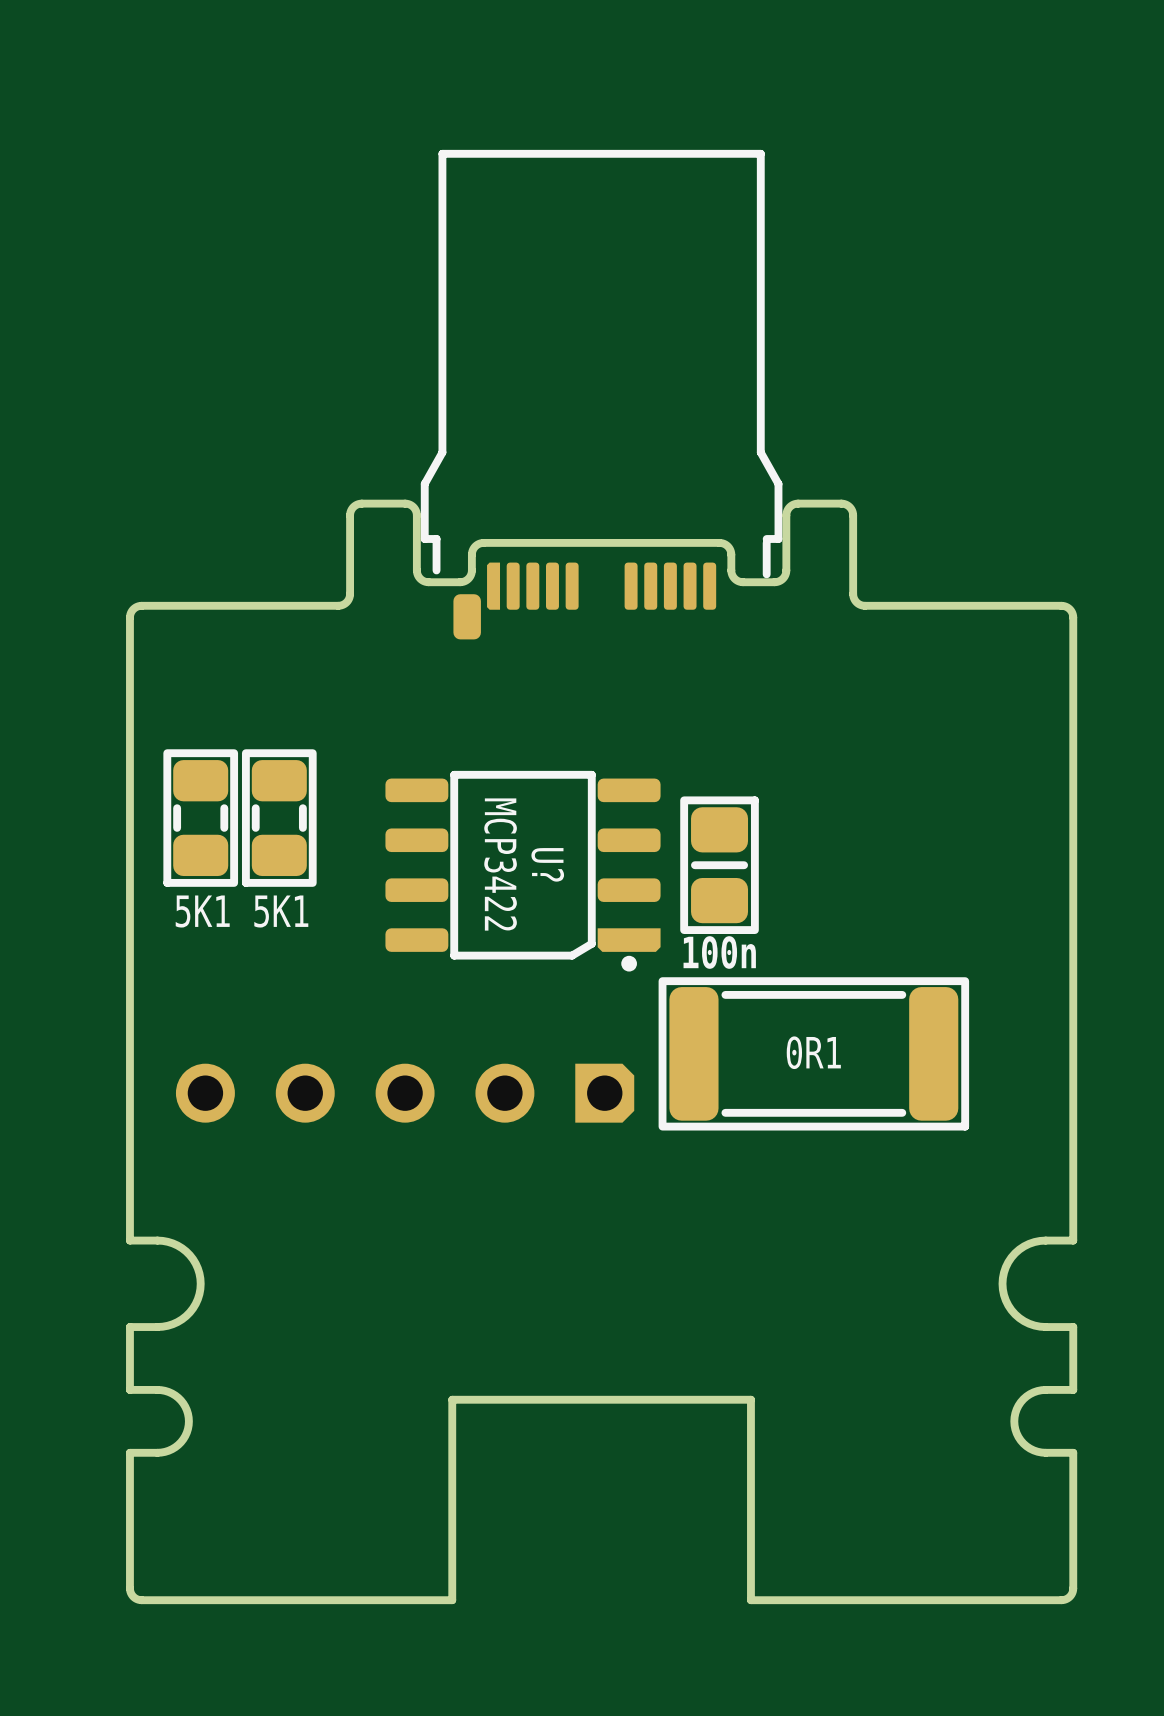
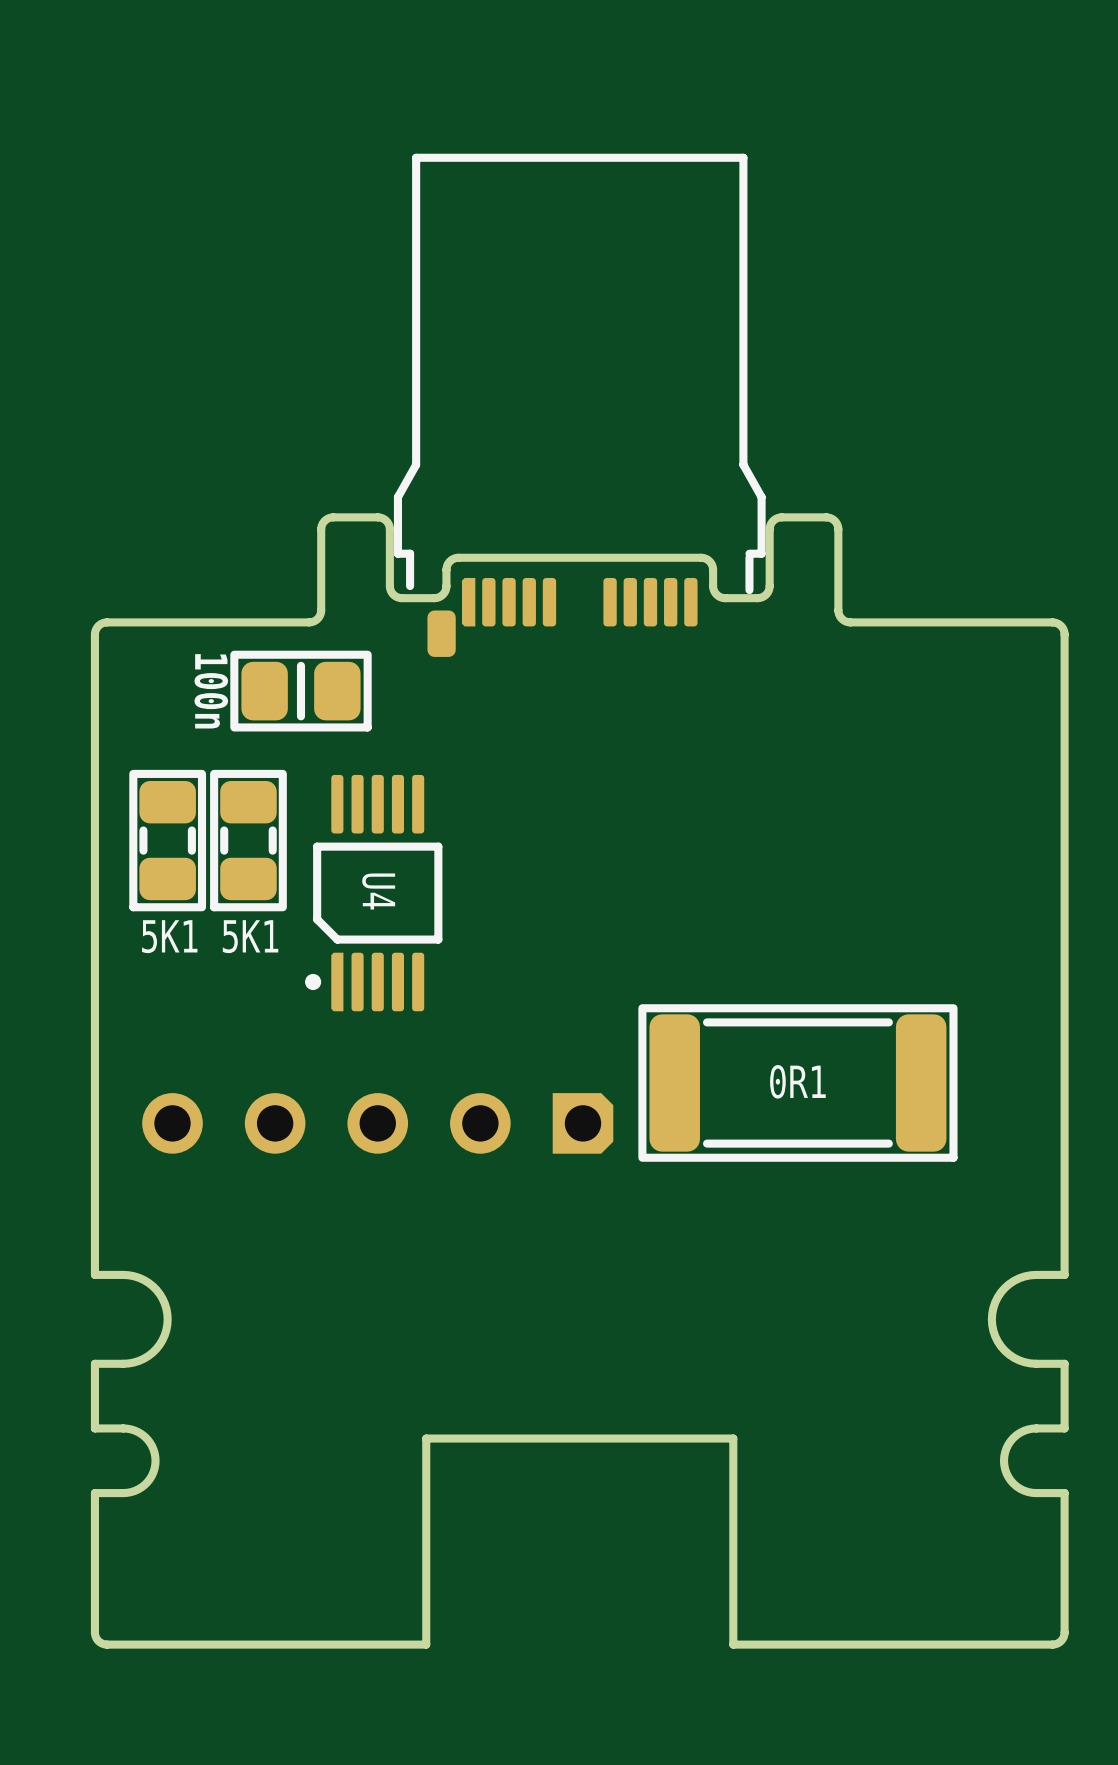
part rotation: 0° (719, 865) -> 90° clockwise (300, 691)
part position: (719, 865) -> (300, 691)
U4: none -> (373, 893)
U?: MCP3422 (523, 871) -> none

